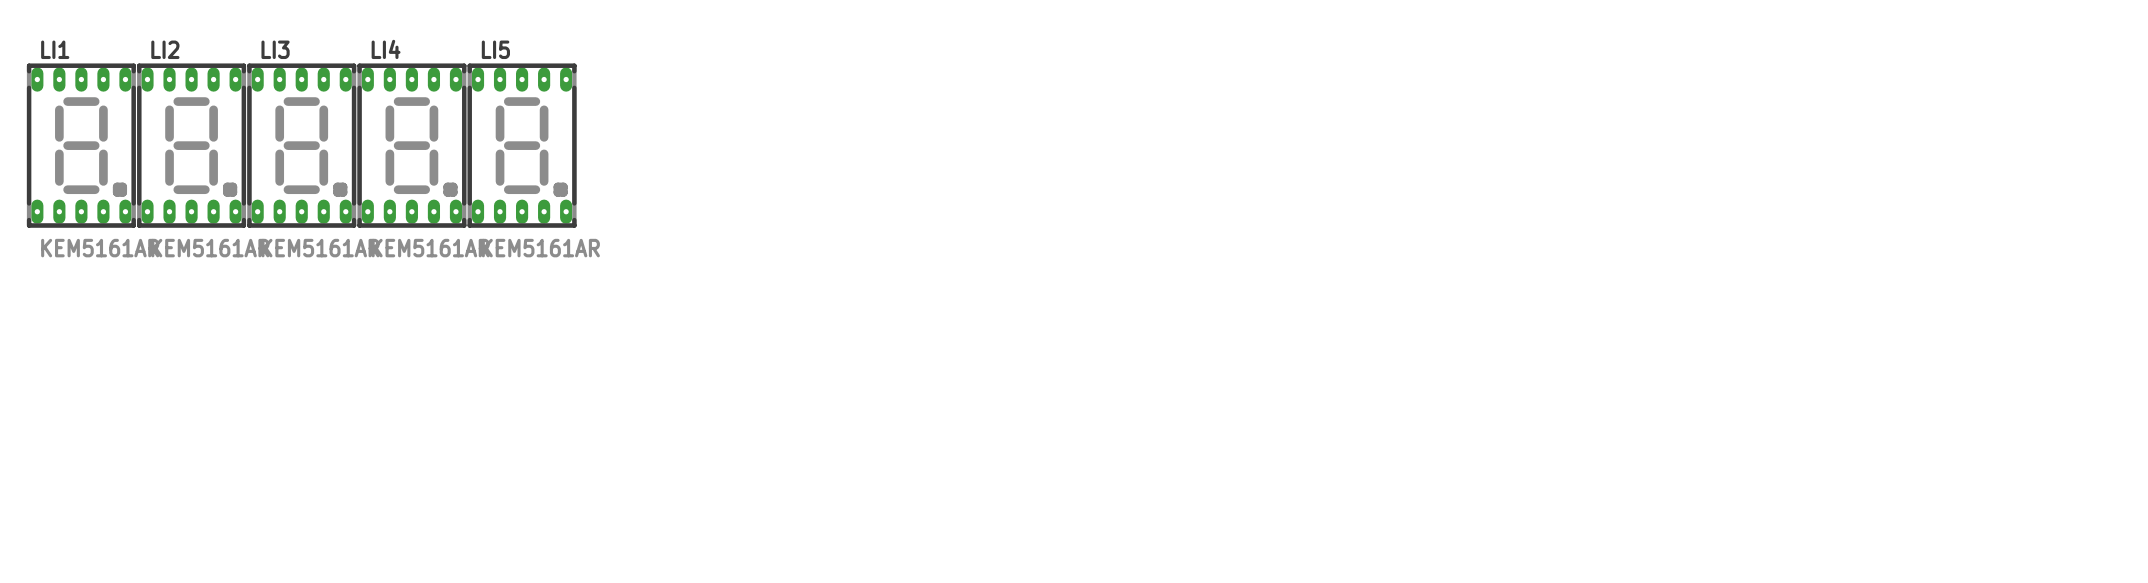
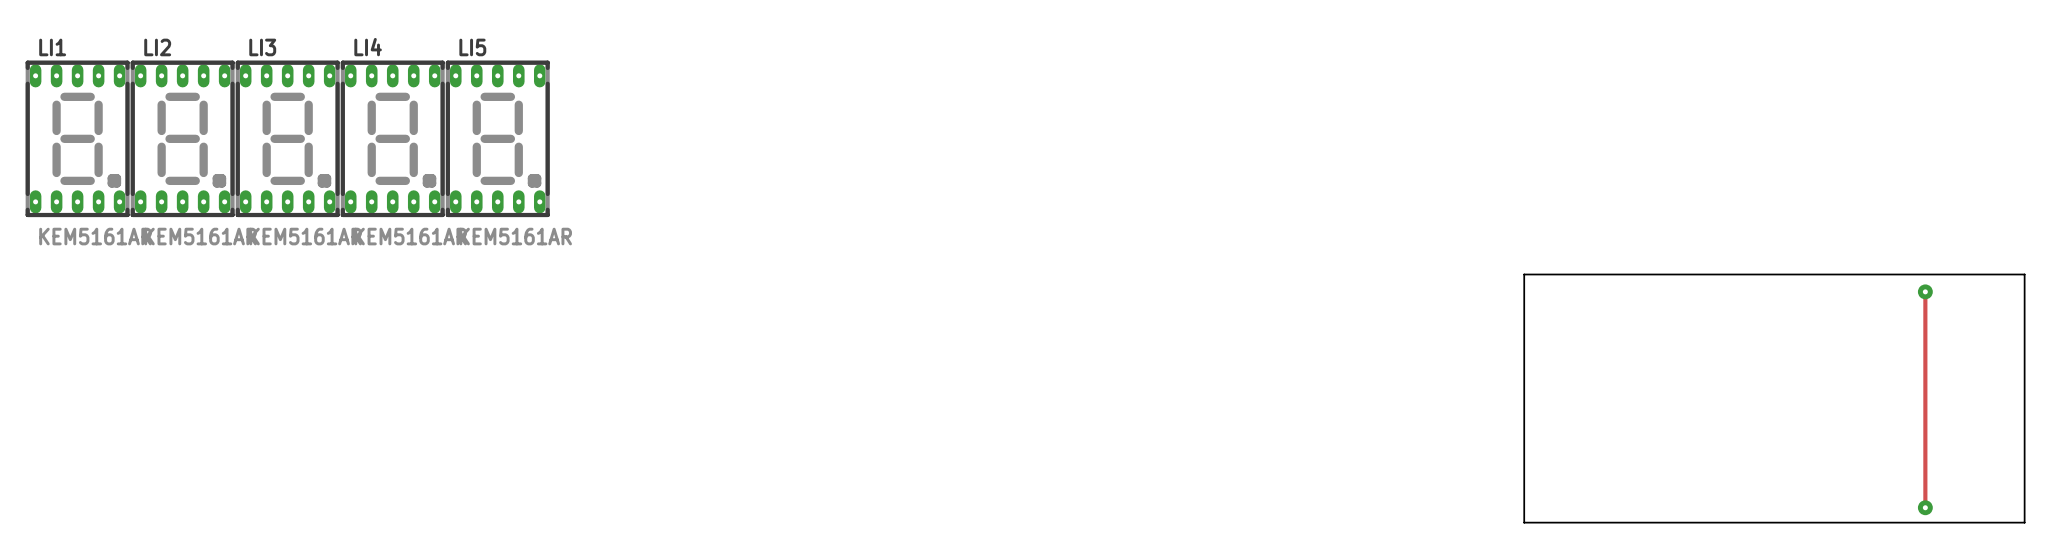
board edge: none -> (1524, 274) (1524, 522) (2024, 522) (2024, 274) (1524, 274)
track: none -> (1925, 291) (1925, 507)
via: none -> (1925, 291)
via: none -> (1925, 507)

